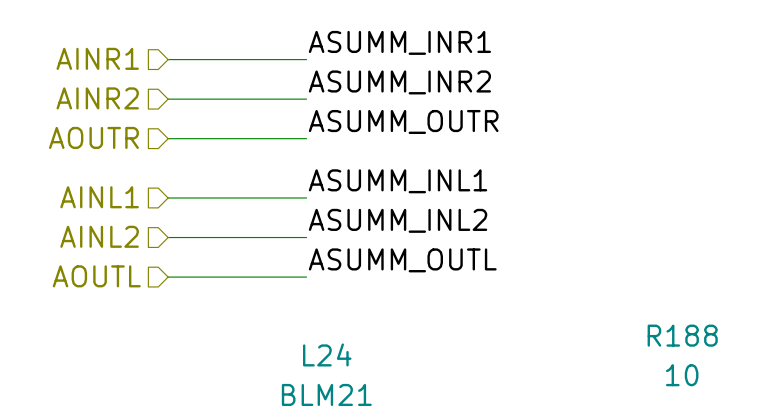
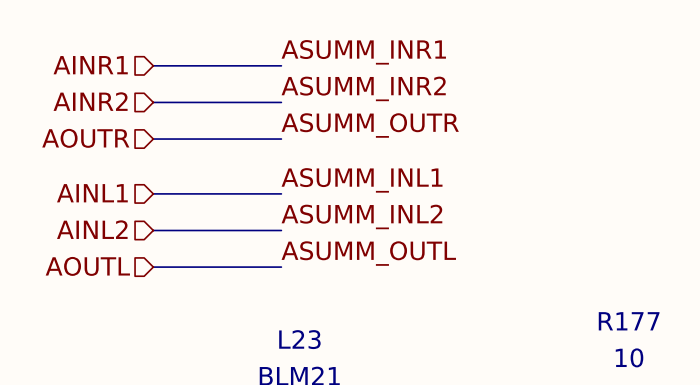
R188 name: R188 (682, 335) -> R177 (629, 321)
L24 name: L24 (327, 354) -> L23 (299, 339)

